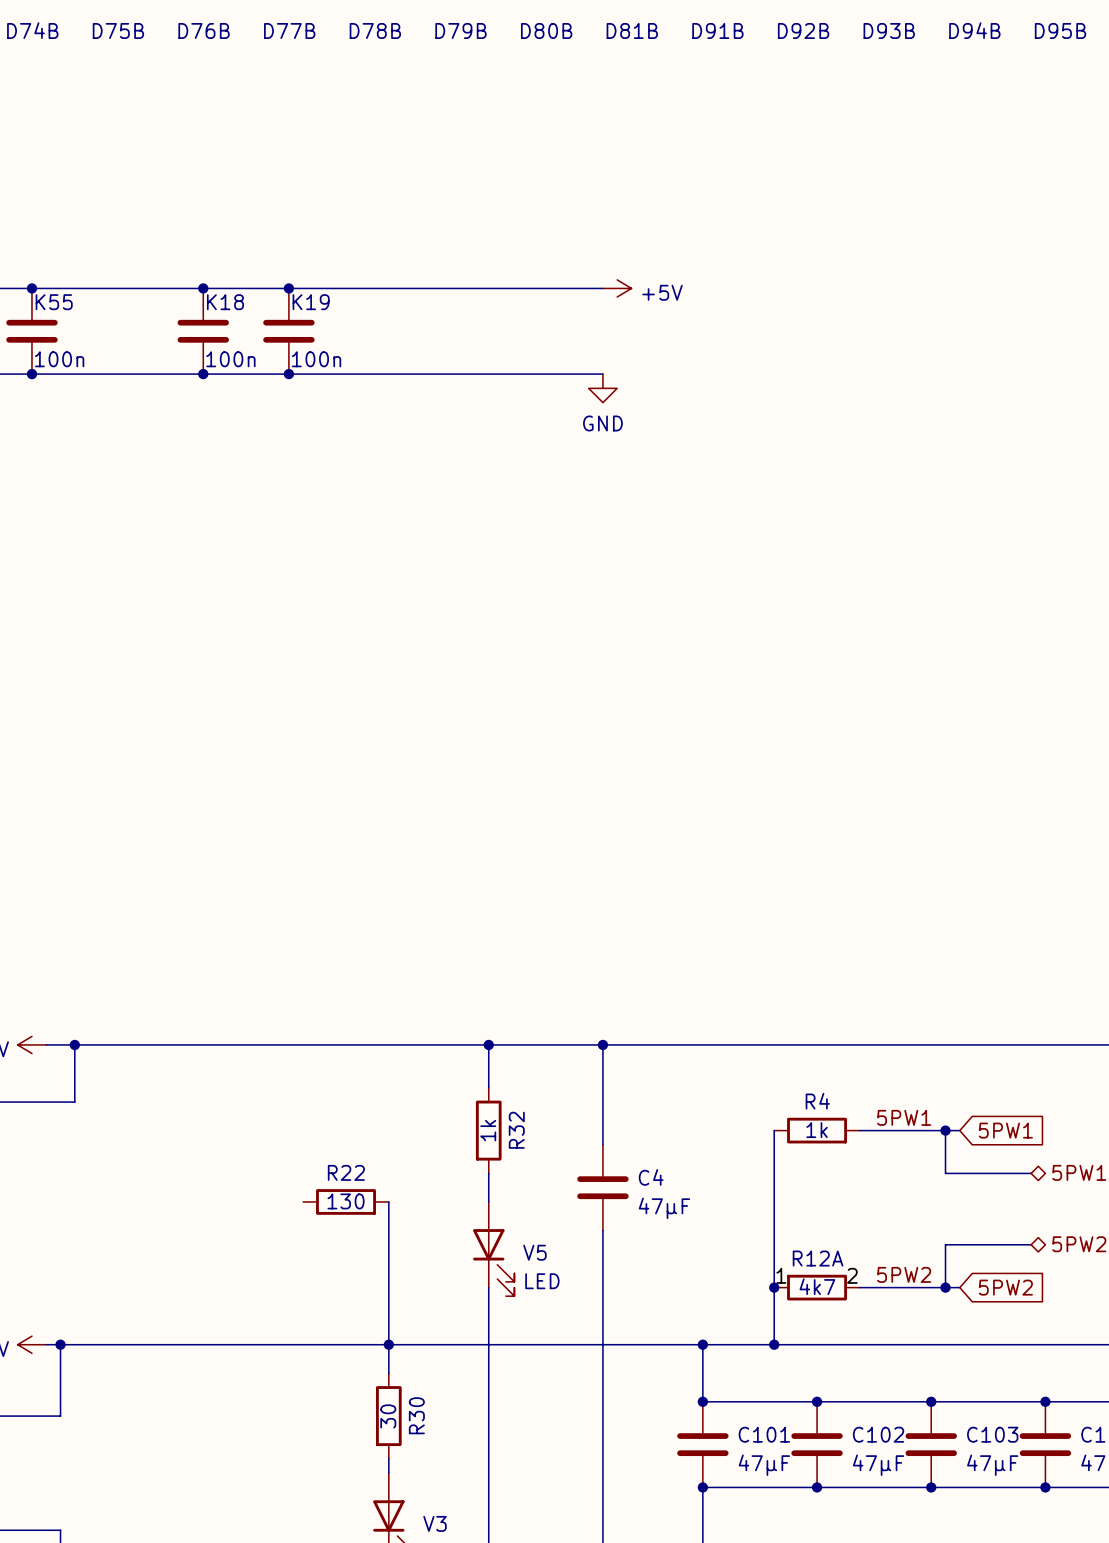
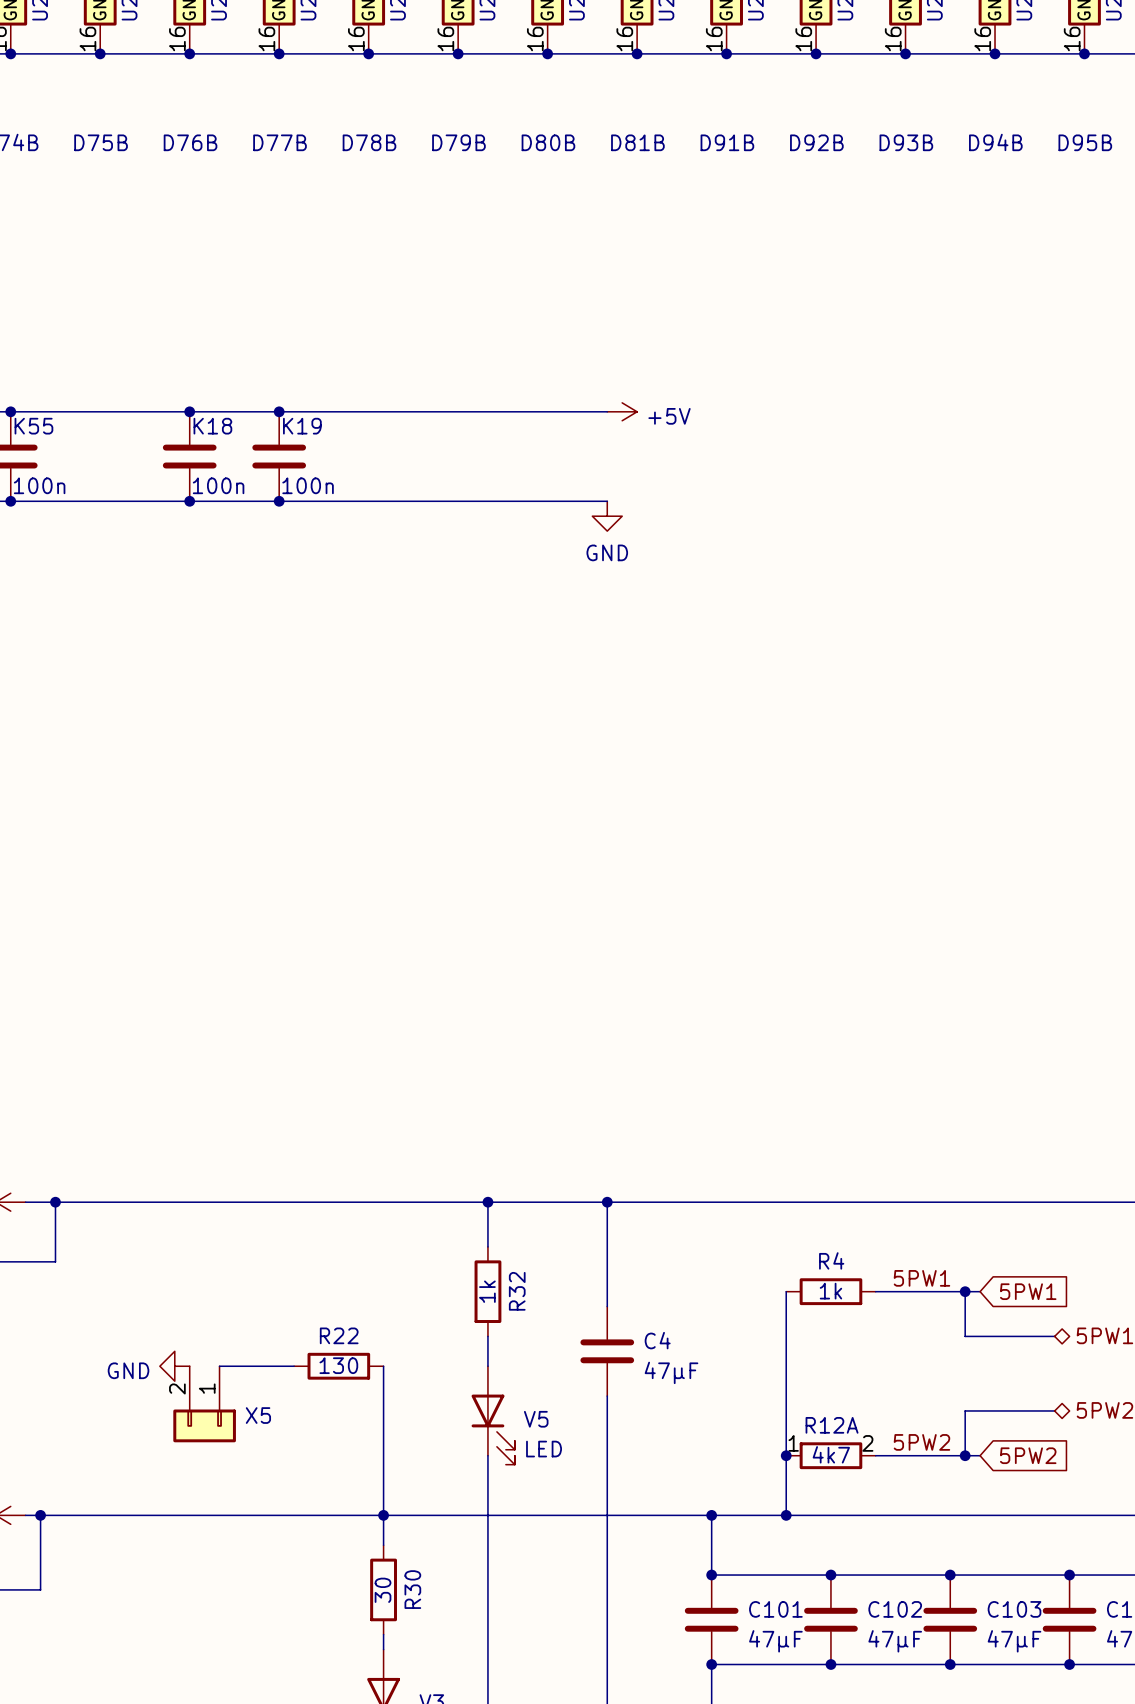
power symbol: none -> GND (174, 1366)
wire: none -> (219, 1366) (294, 1366)
X5: none -> (204, 1404)

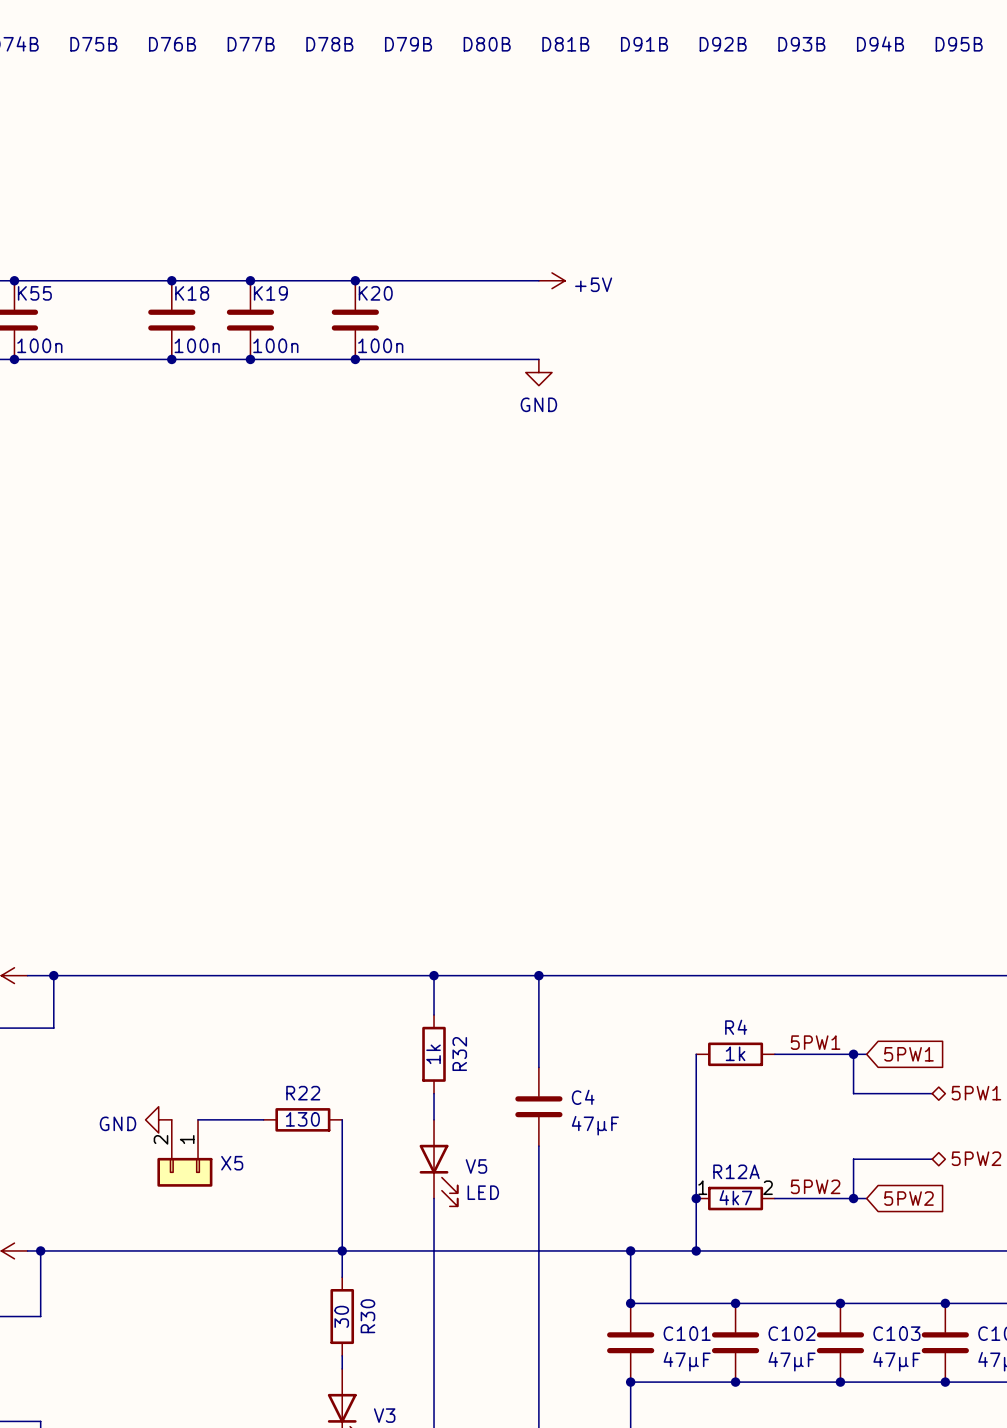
junction: none -> (355, 280)
K20: none -> 100n (355, 320)
junction: none -> (355, 359)

